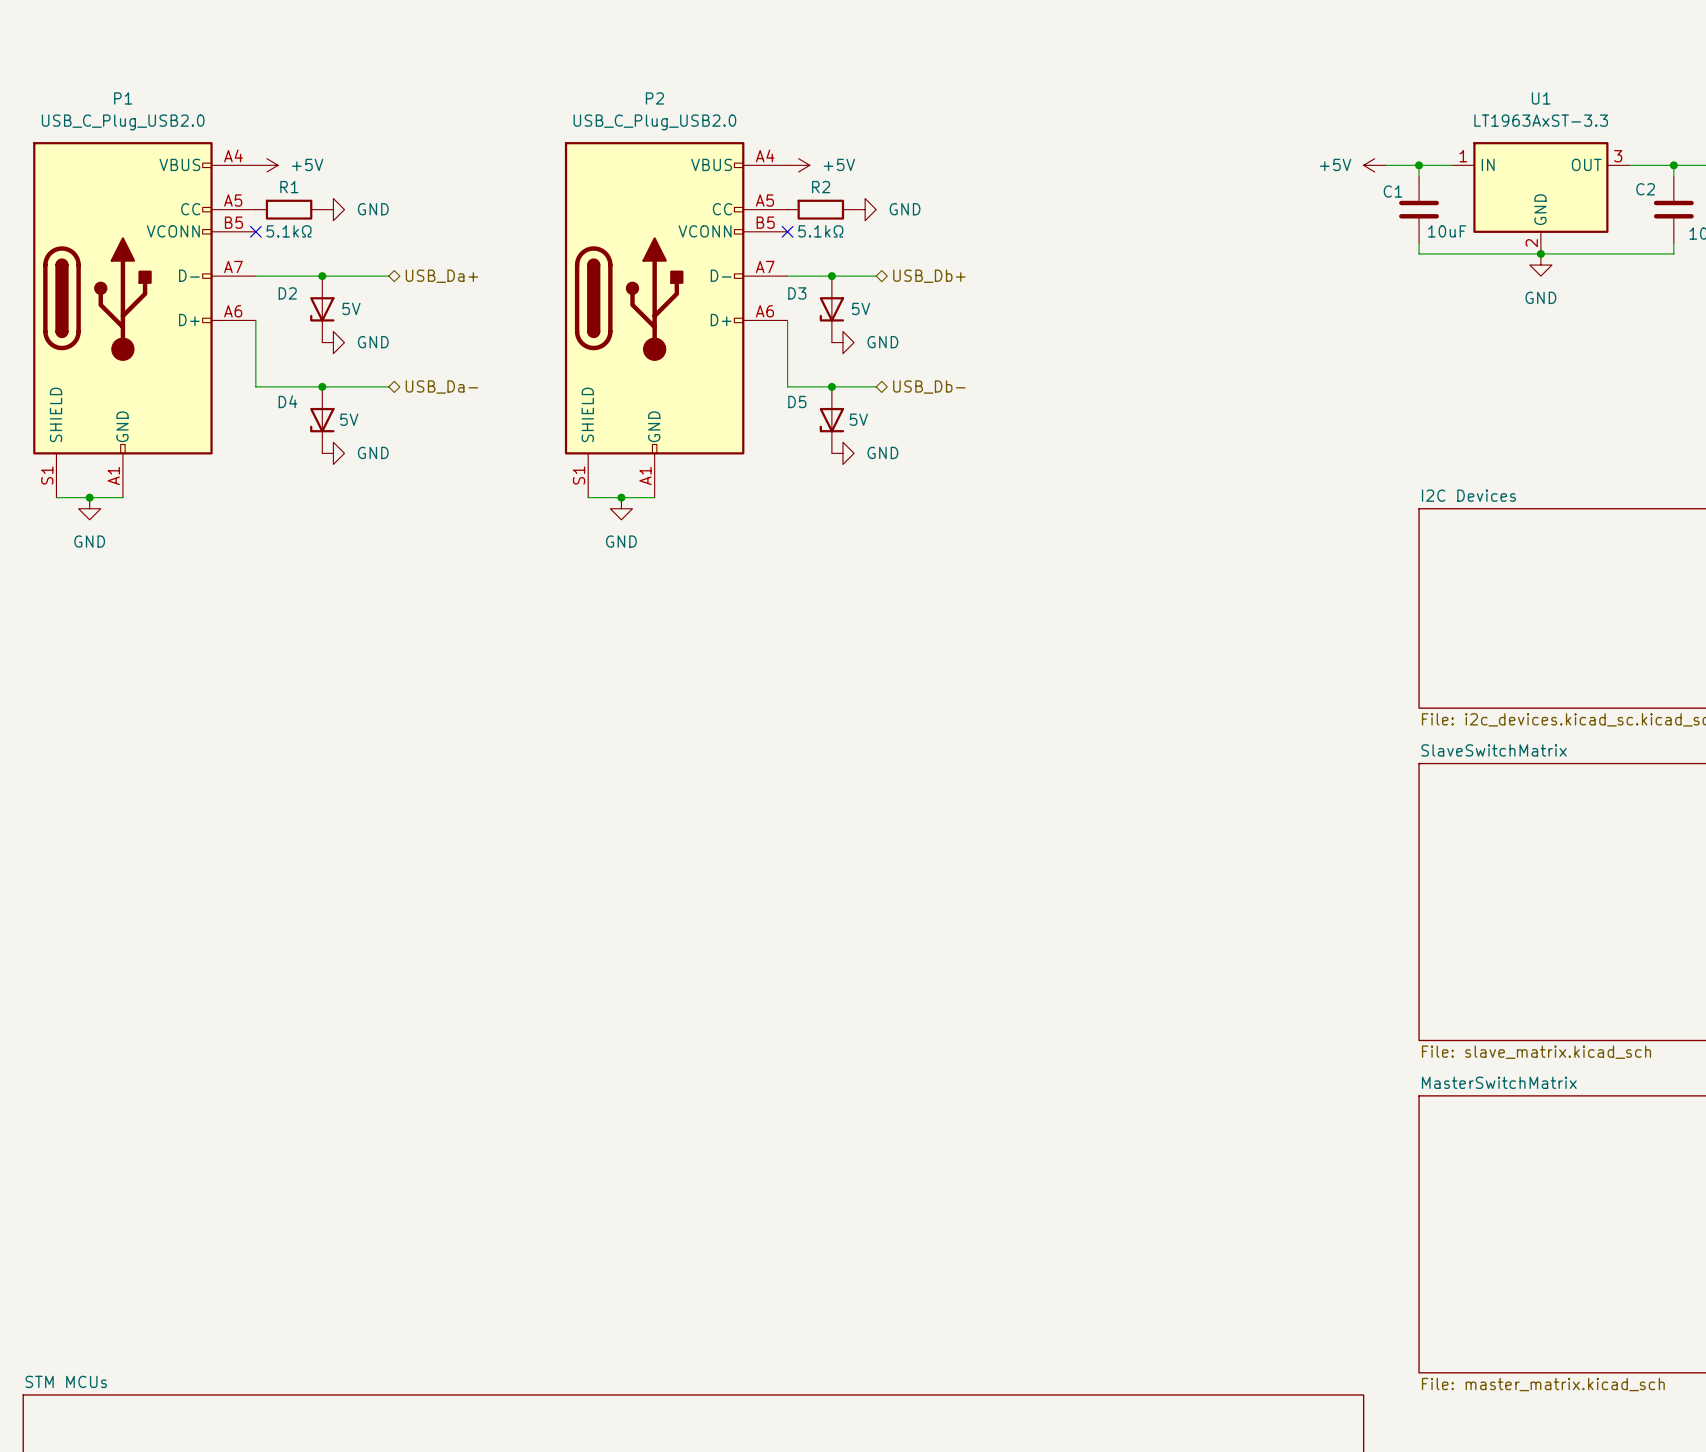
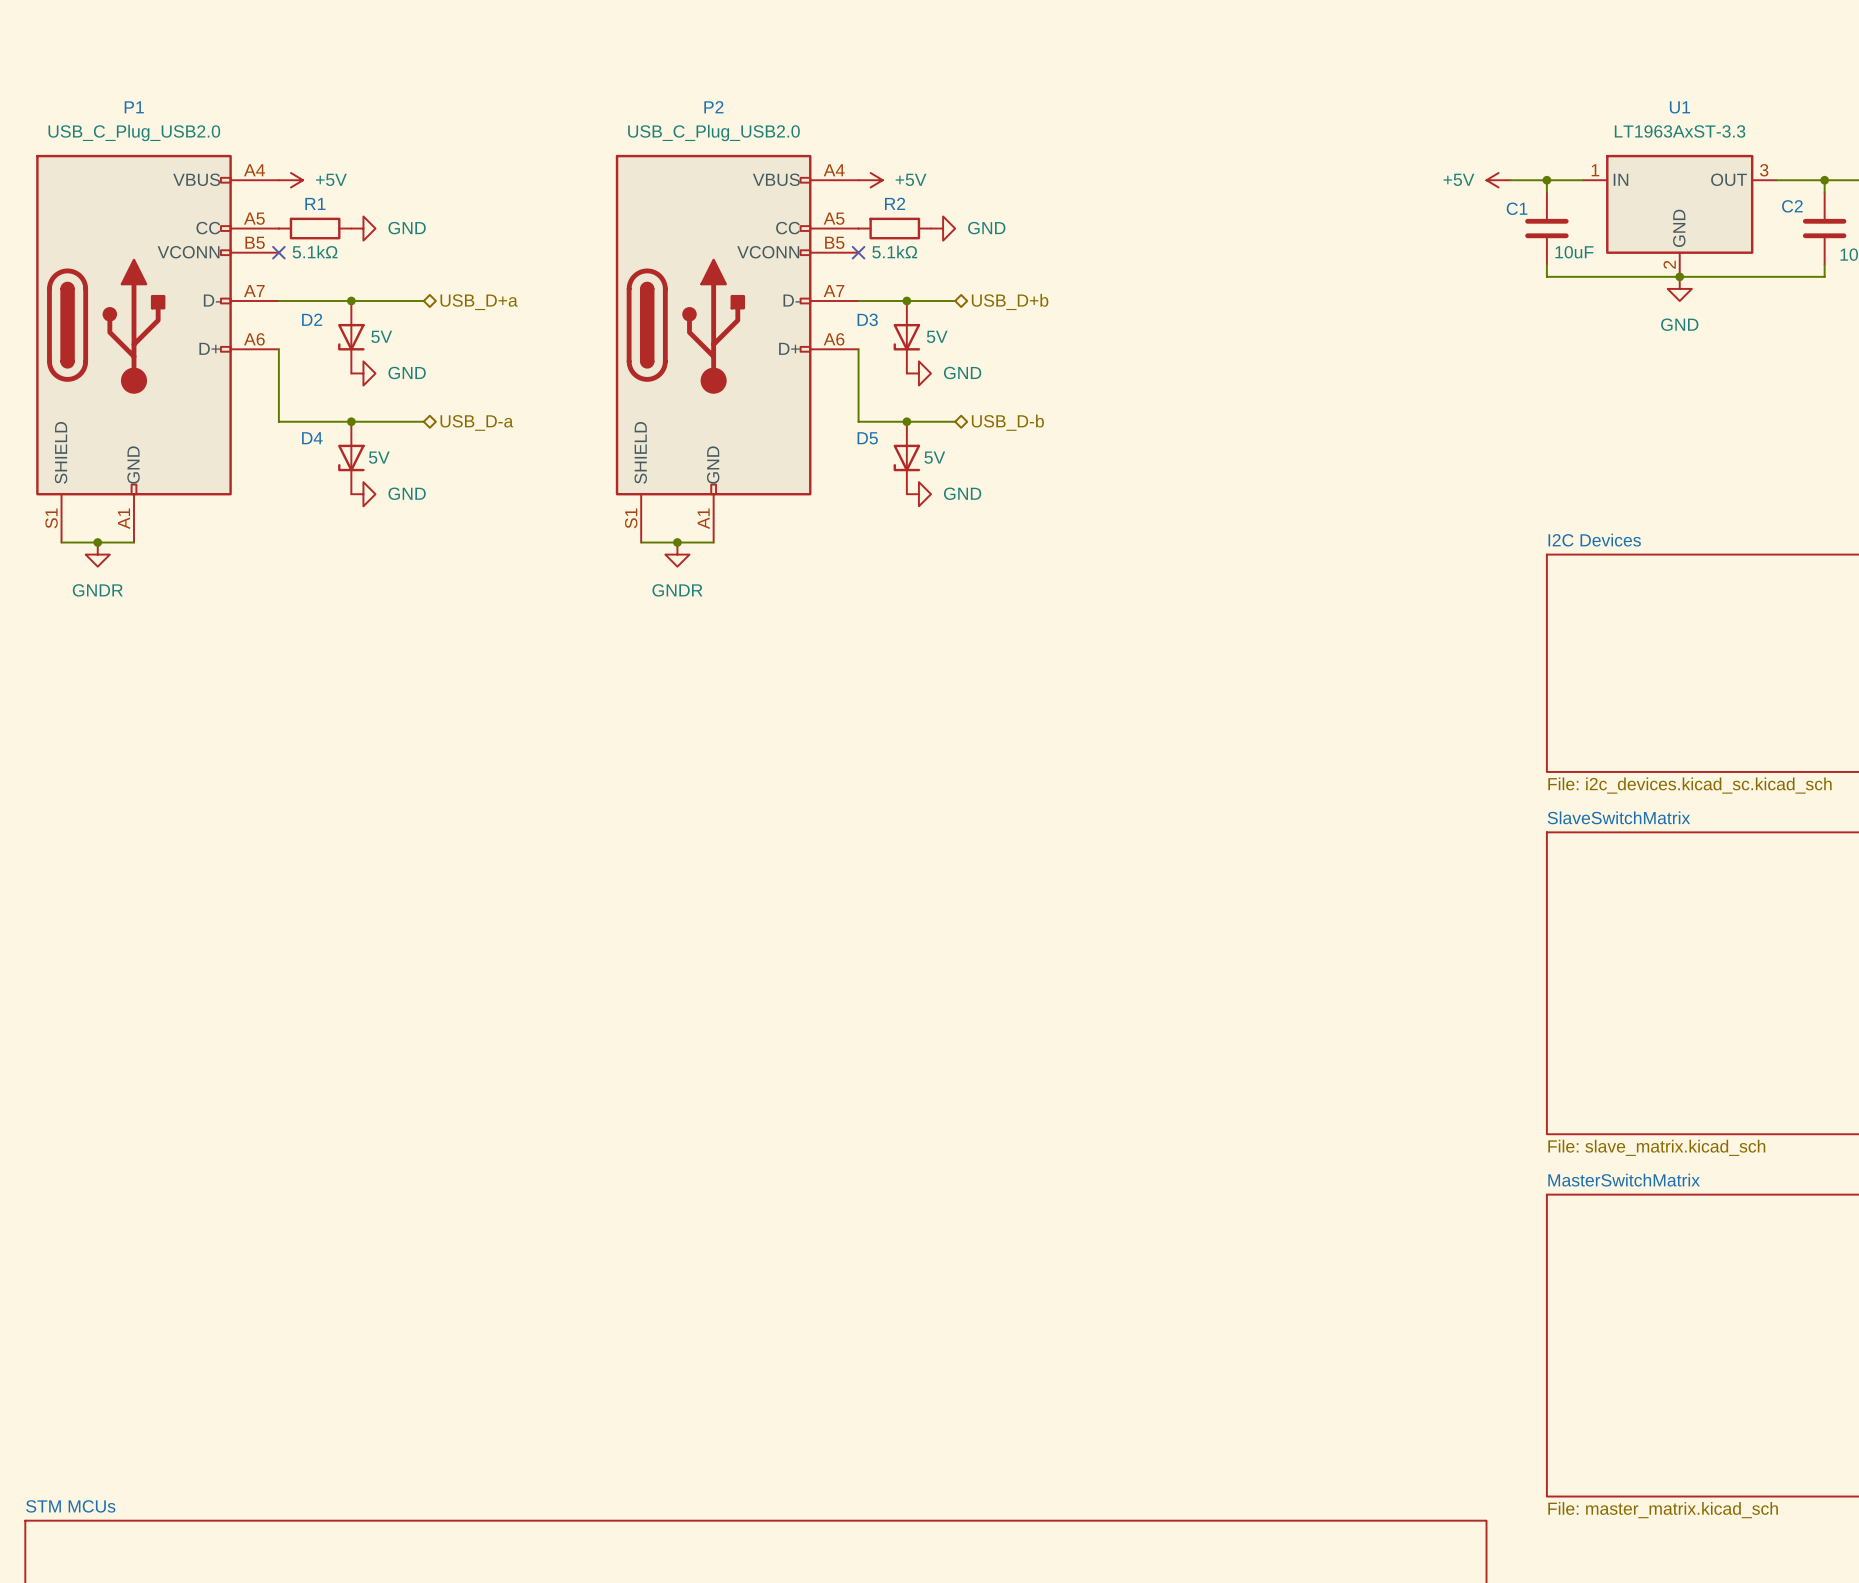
hierarchical label: USB_Da+ (441, 276) -> USB_D+a (479, 302)
hierarchical label: USB_Db+ (929, 276) -> USB_D+b (1010, 301)
hierarchical label: USB_Da- (441, 387) -> USB_D-a (476, 422)
hierarchical label: USB_Db- (929, 387) -> USB_D-b (1007, 422)
power symbol: GND (89, 508) -> GNDR (97, 554)
power symbol: GND (621, 508) -> GNDR (677, 554)

